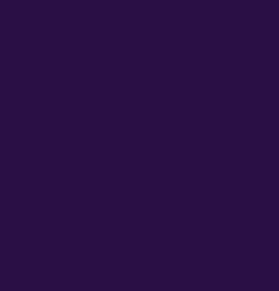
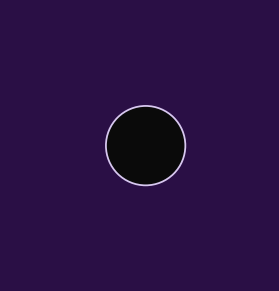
part: none -> (145, 145)

